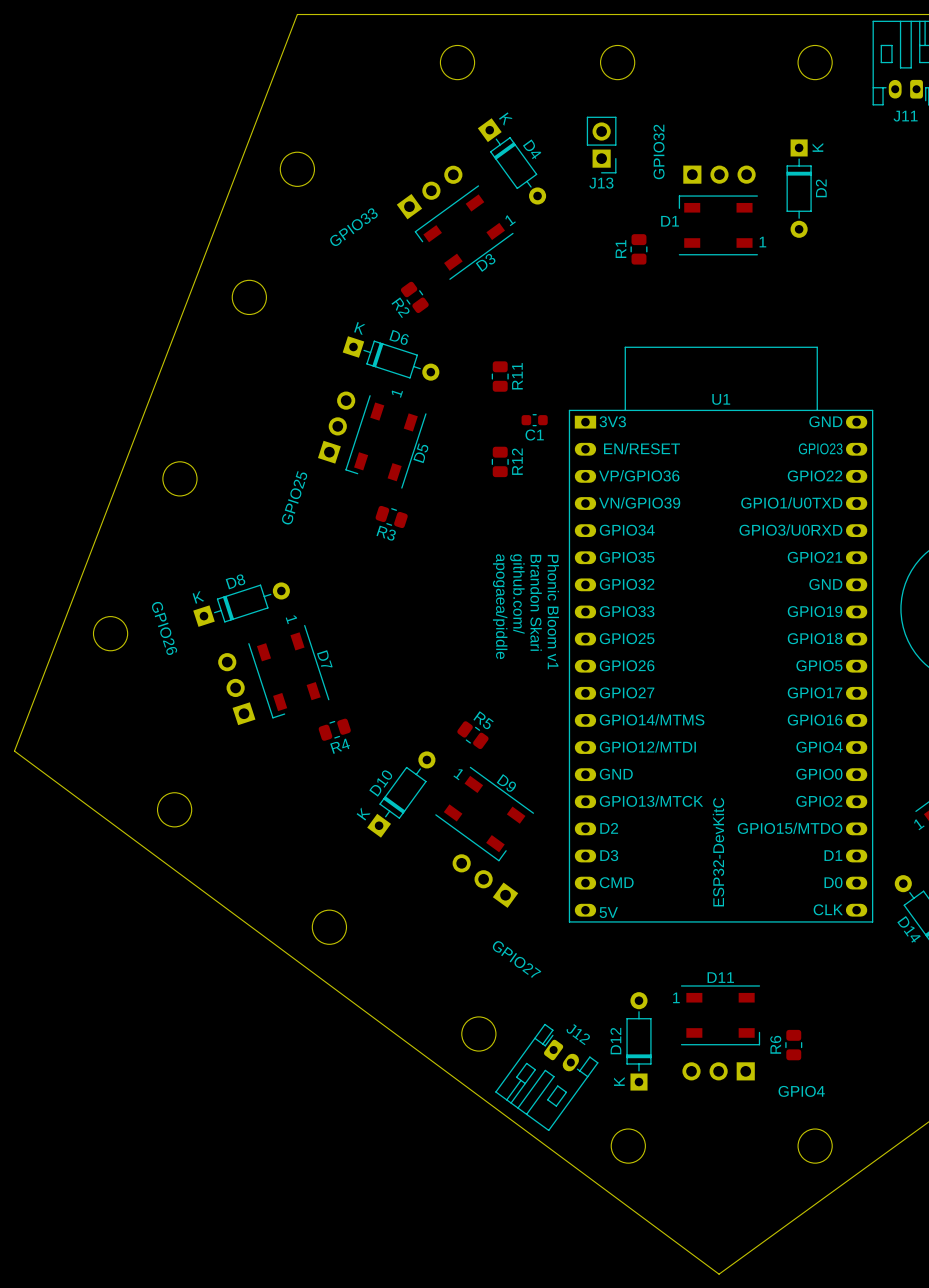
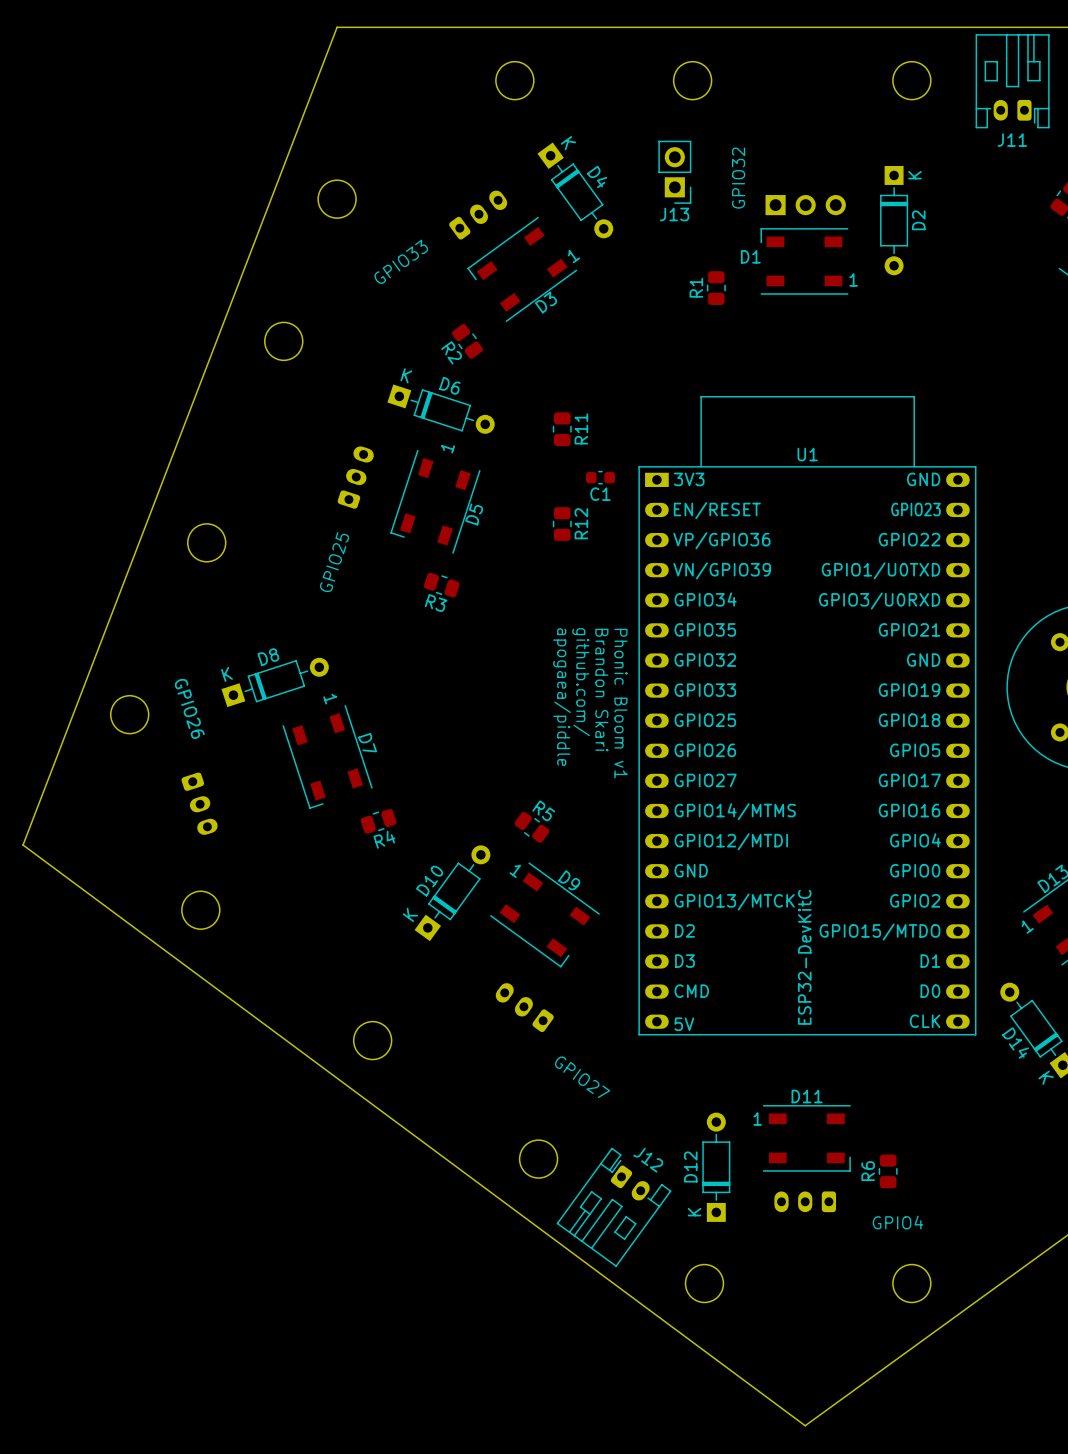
part footprint: [396, 165, 463, 220] -> [449, 190, 508, 240]
part: none -> (355, 477)
part: (336, 427) -> none
part: (236, 689) -> none
part: none -> (199, 803)
part: (485, 881) -> none
part: none -> (524, 1007)
part footprint: [682, 1062, 755, 1081] -> [774, 1191, 837, 1213]

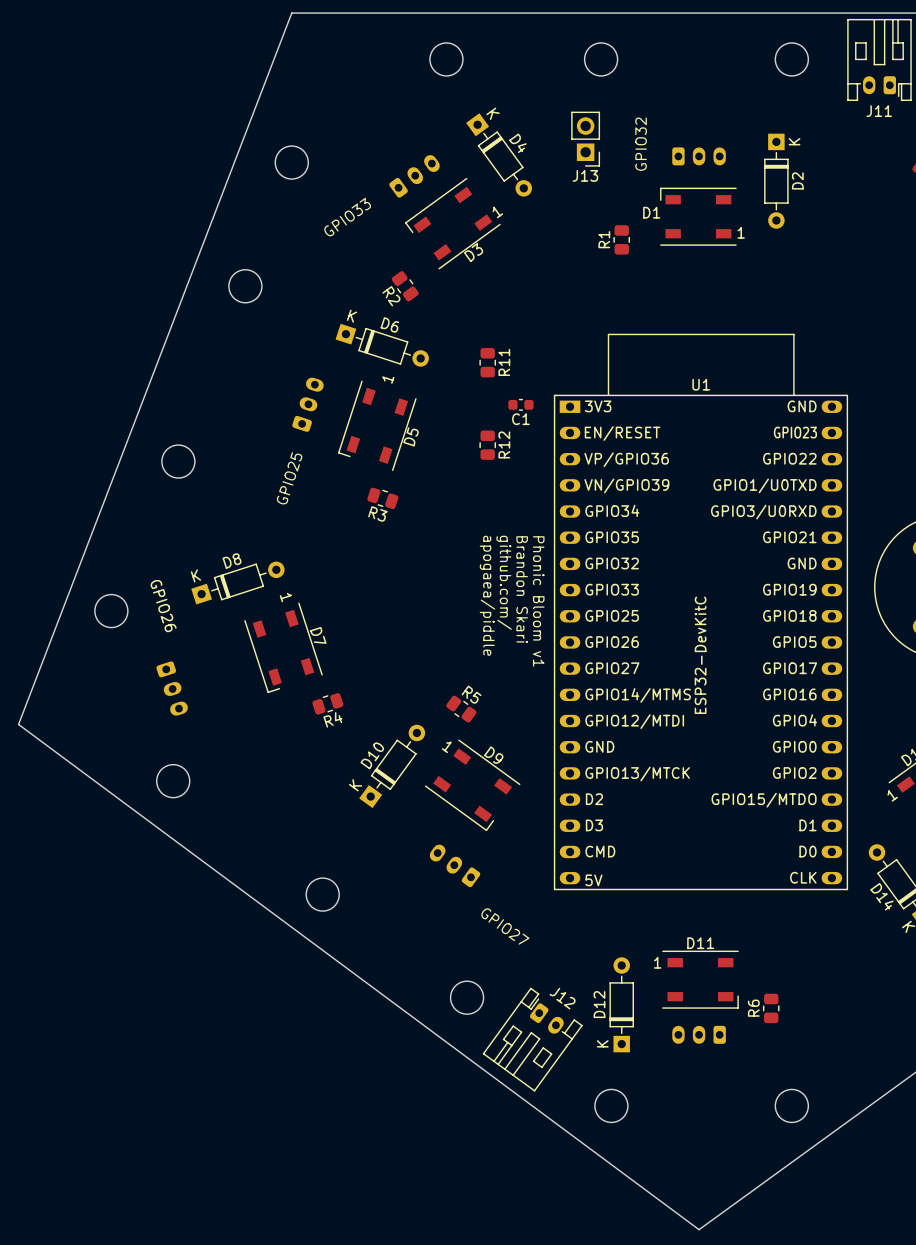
part: none -> (699, 156)
part: (805, 205) -> none
U1 value position: ESP32-DevKitC (804, 957) -> ESP32-DevKitC (700, 655)
text: GPIO4 (897, 1222) -> none

